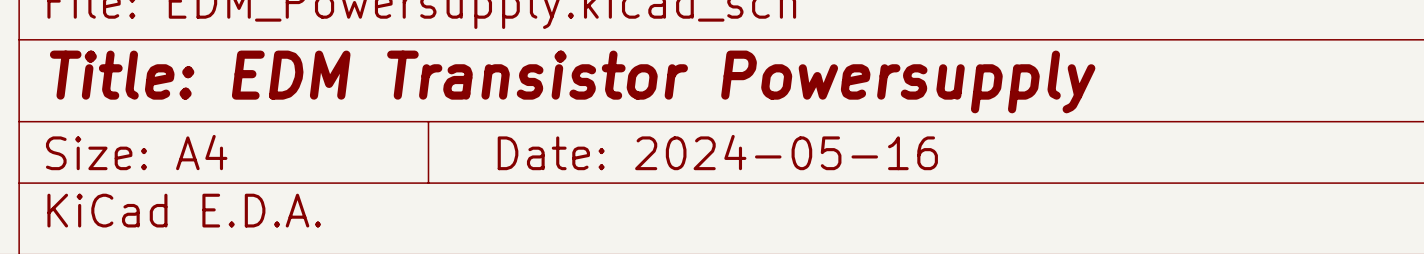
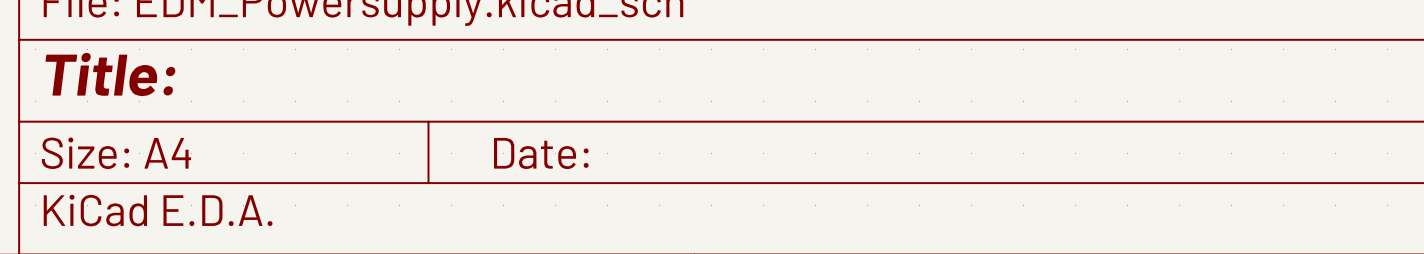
title block: Title: EDM Transistor Powersupply (572, 81) -> Title: (110, 74)
title block: Date: 2024-05-16 (717, 152) -> Date: (541, 153)

